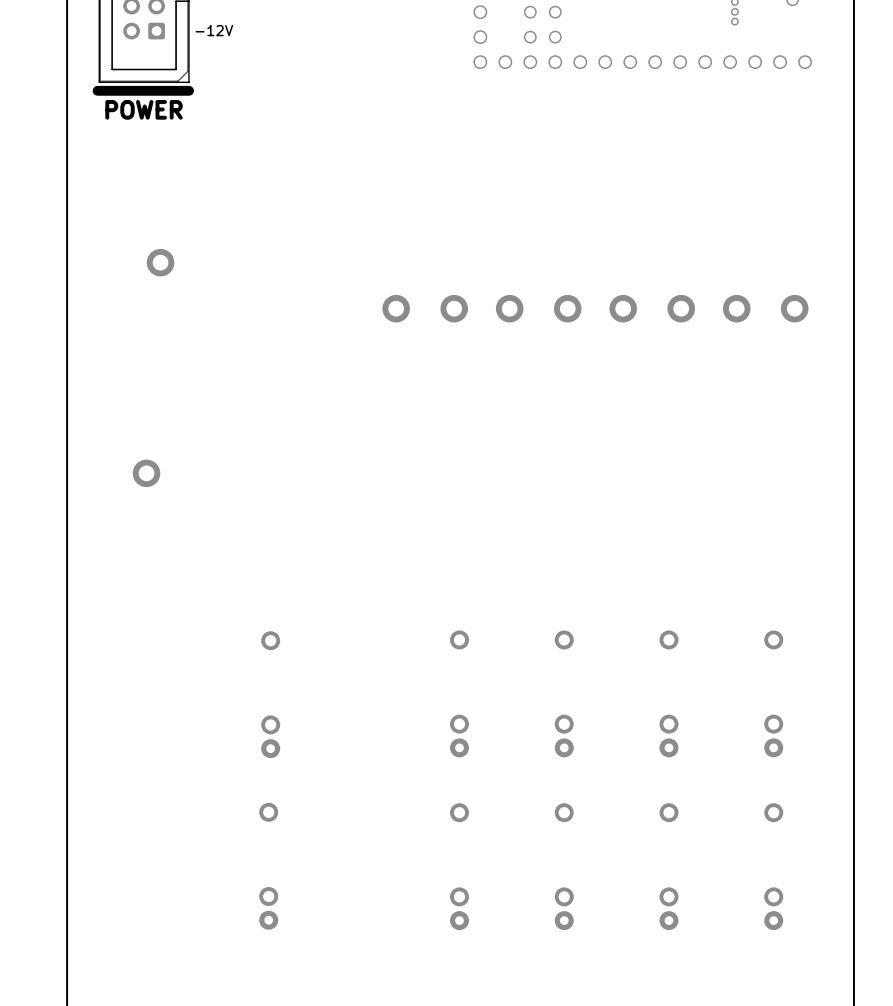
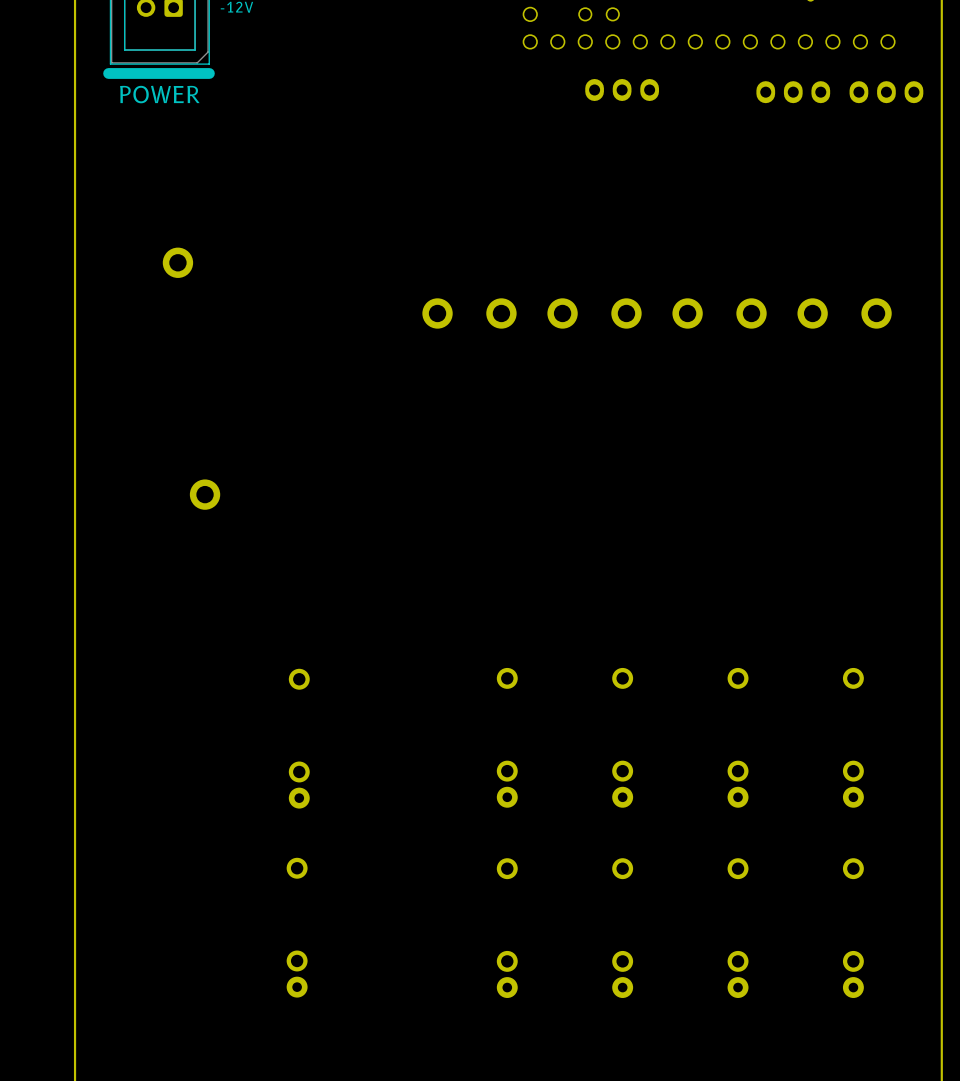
part: none -> (622, 89)
part: none -> (793, 92)
part: none -> (886, 92)
part position: (146, 473) -> (205, 494)

